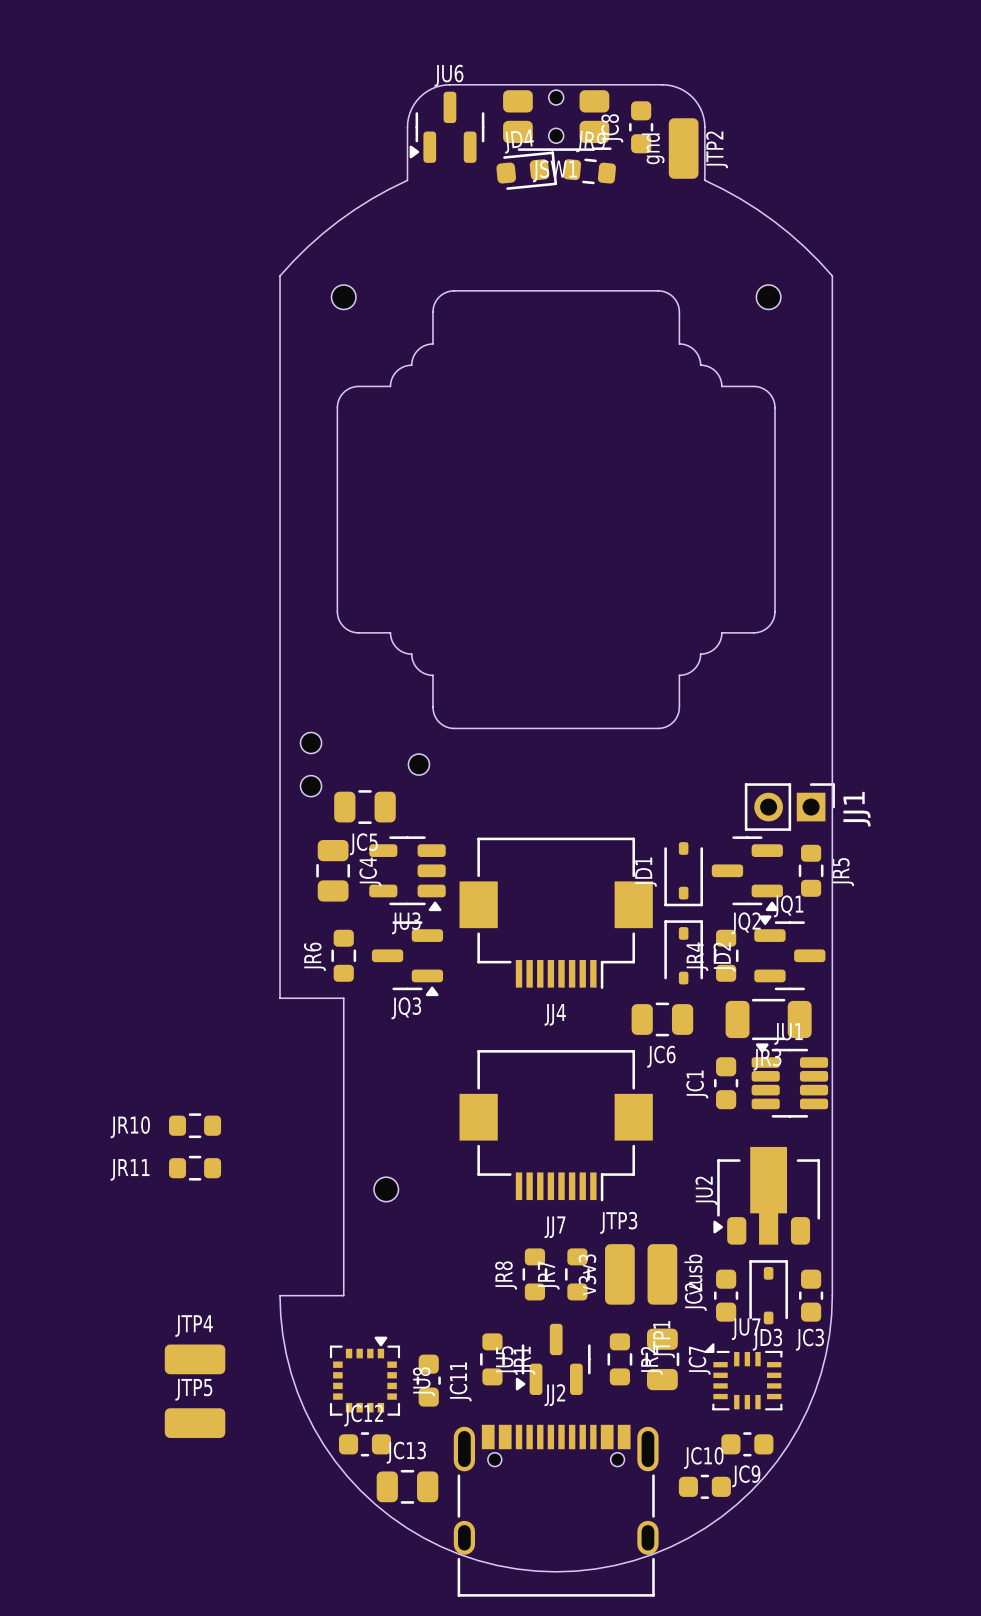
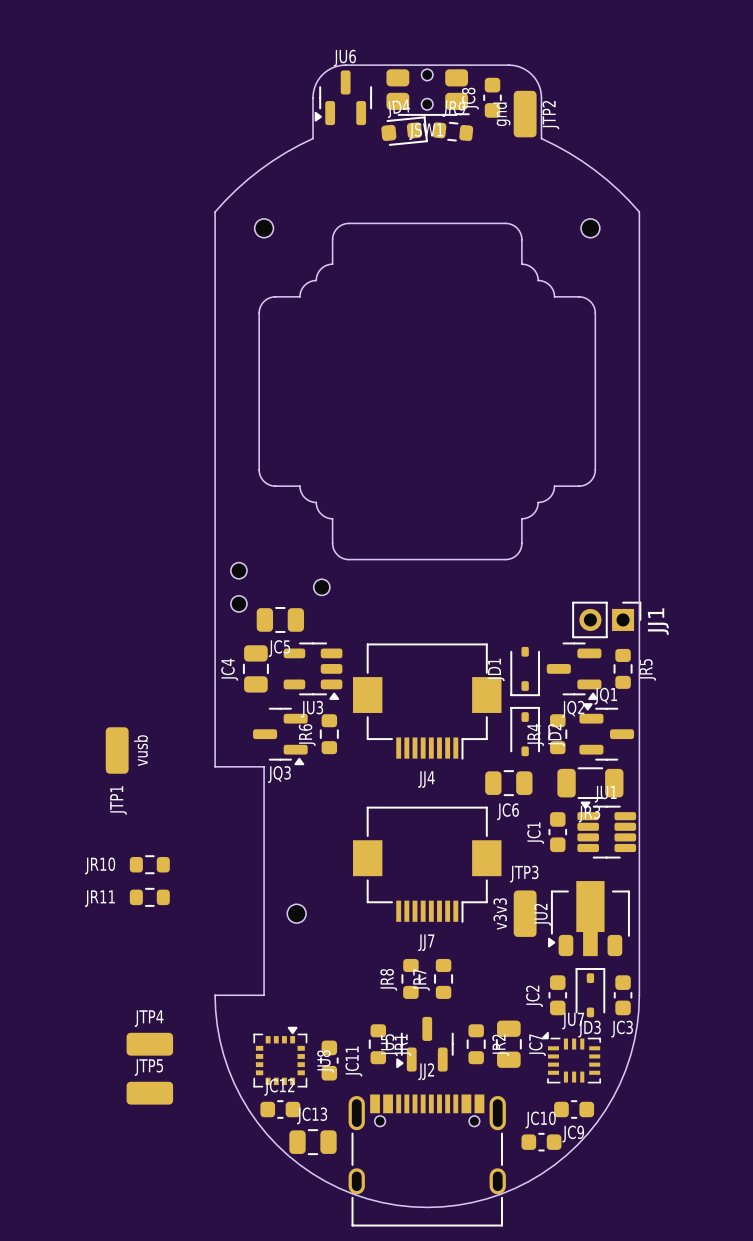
JC4 name position: JC4 (370, 871) -> JC4 (229, 669)
JR6 position: (343, 955) -> (329, 734)
JQ3 position: (407, 958) -> (280, 736)
JTP3 position: (619, 1274) -> (525, 913)
JTP1 position: (662, 1274) -> (117, 750)

